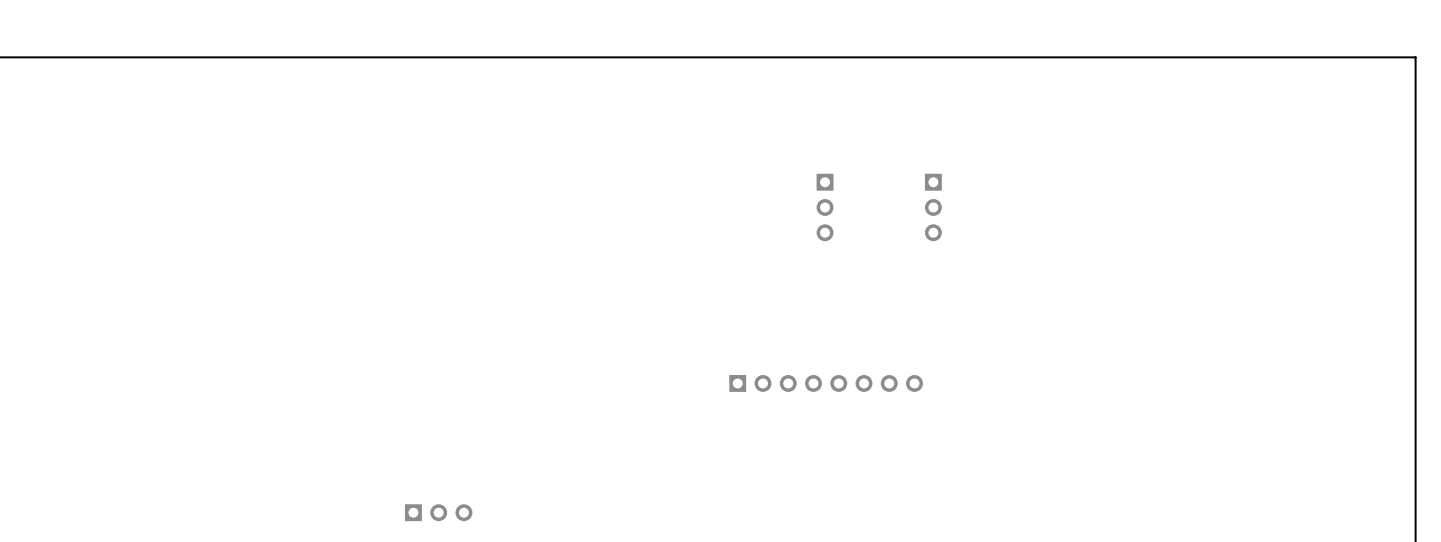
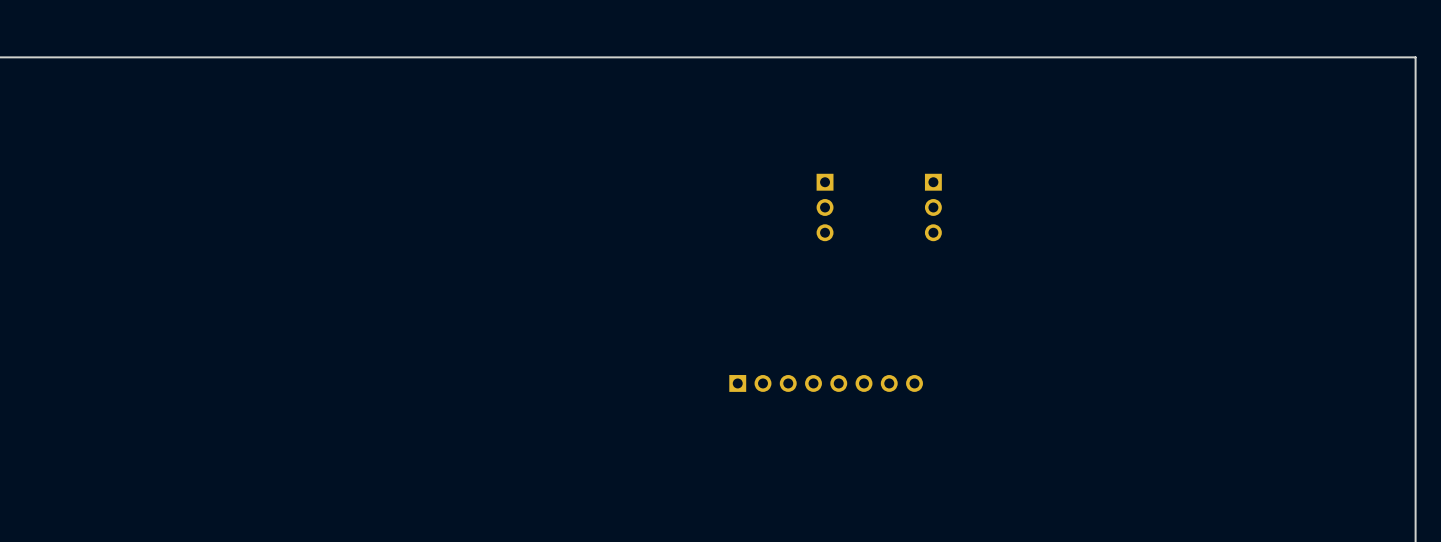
part: (438, 512) -> none

